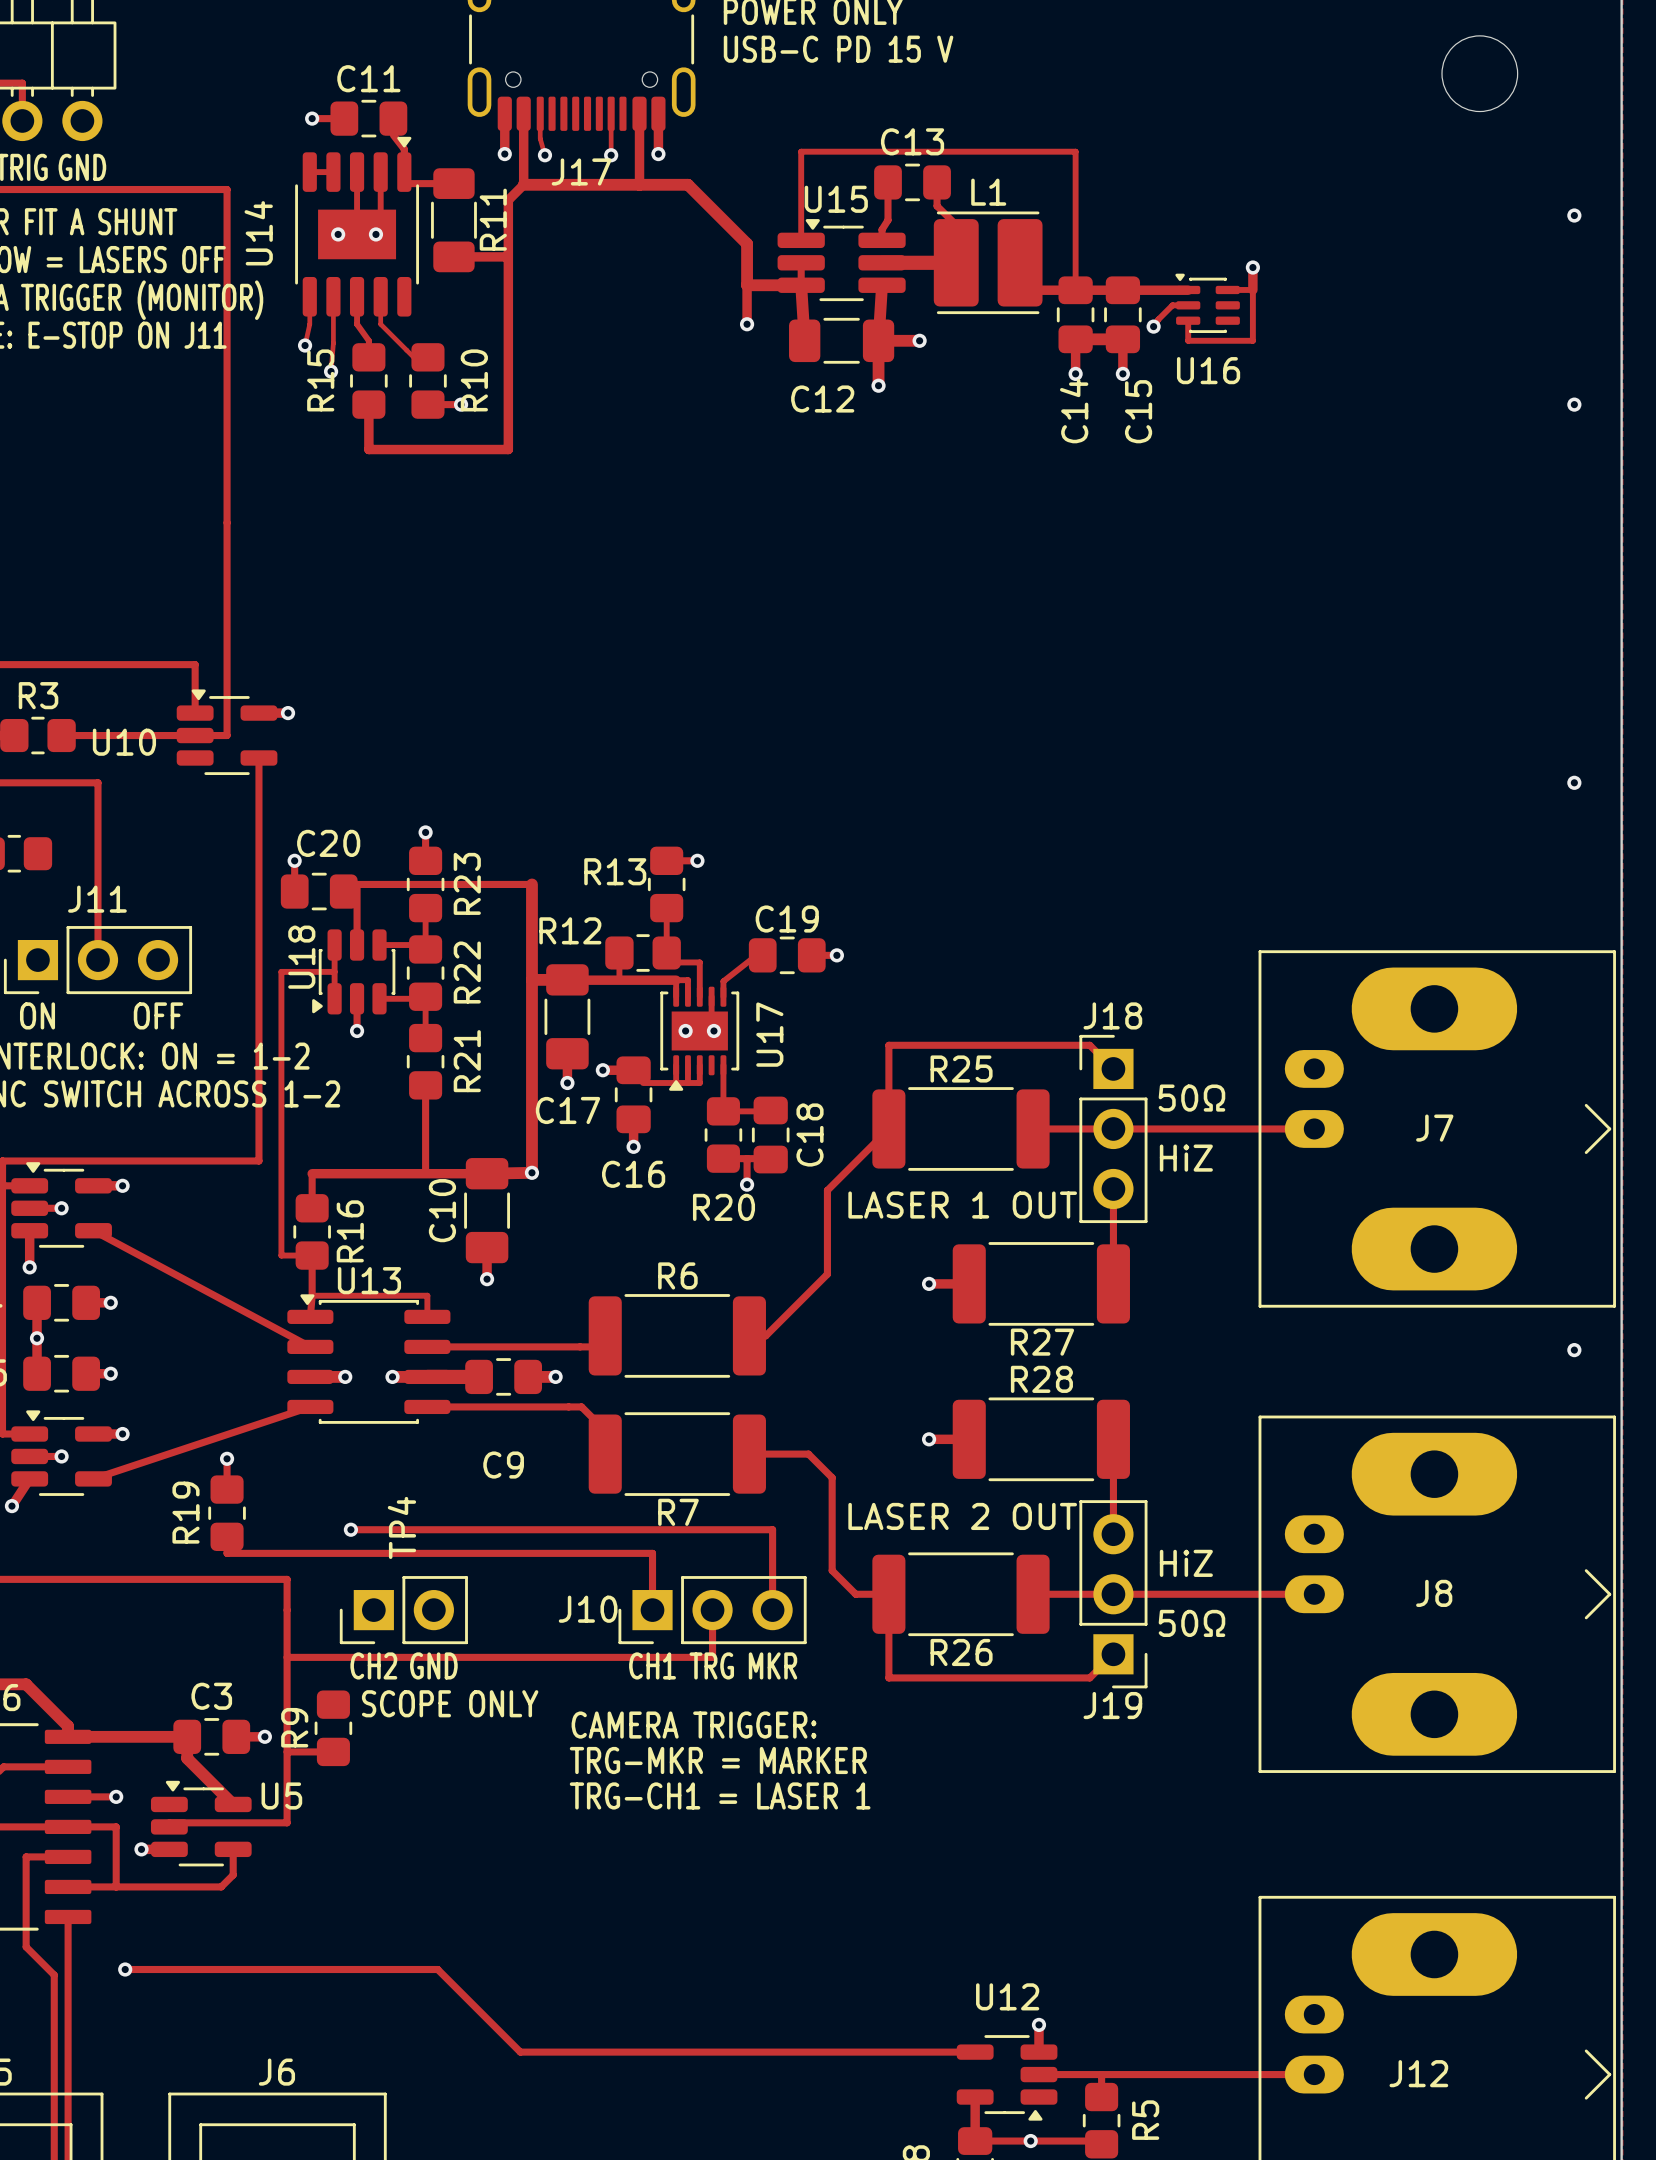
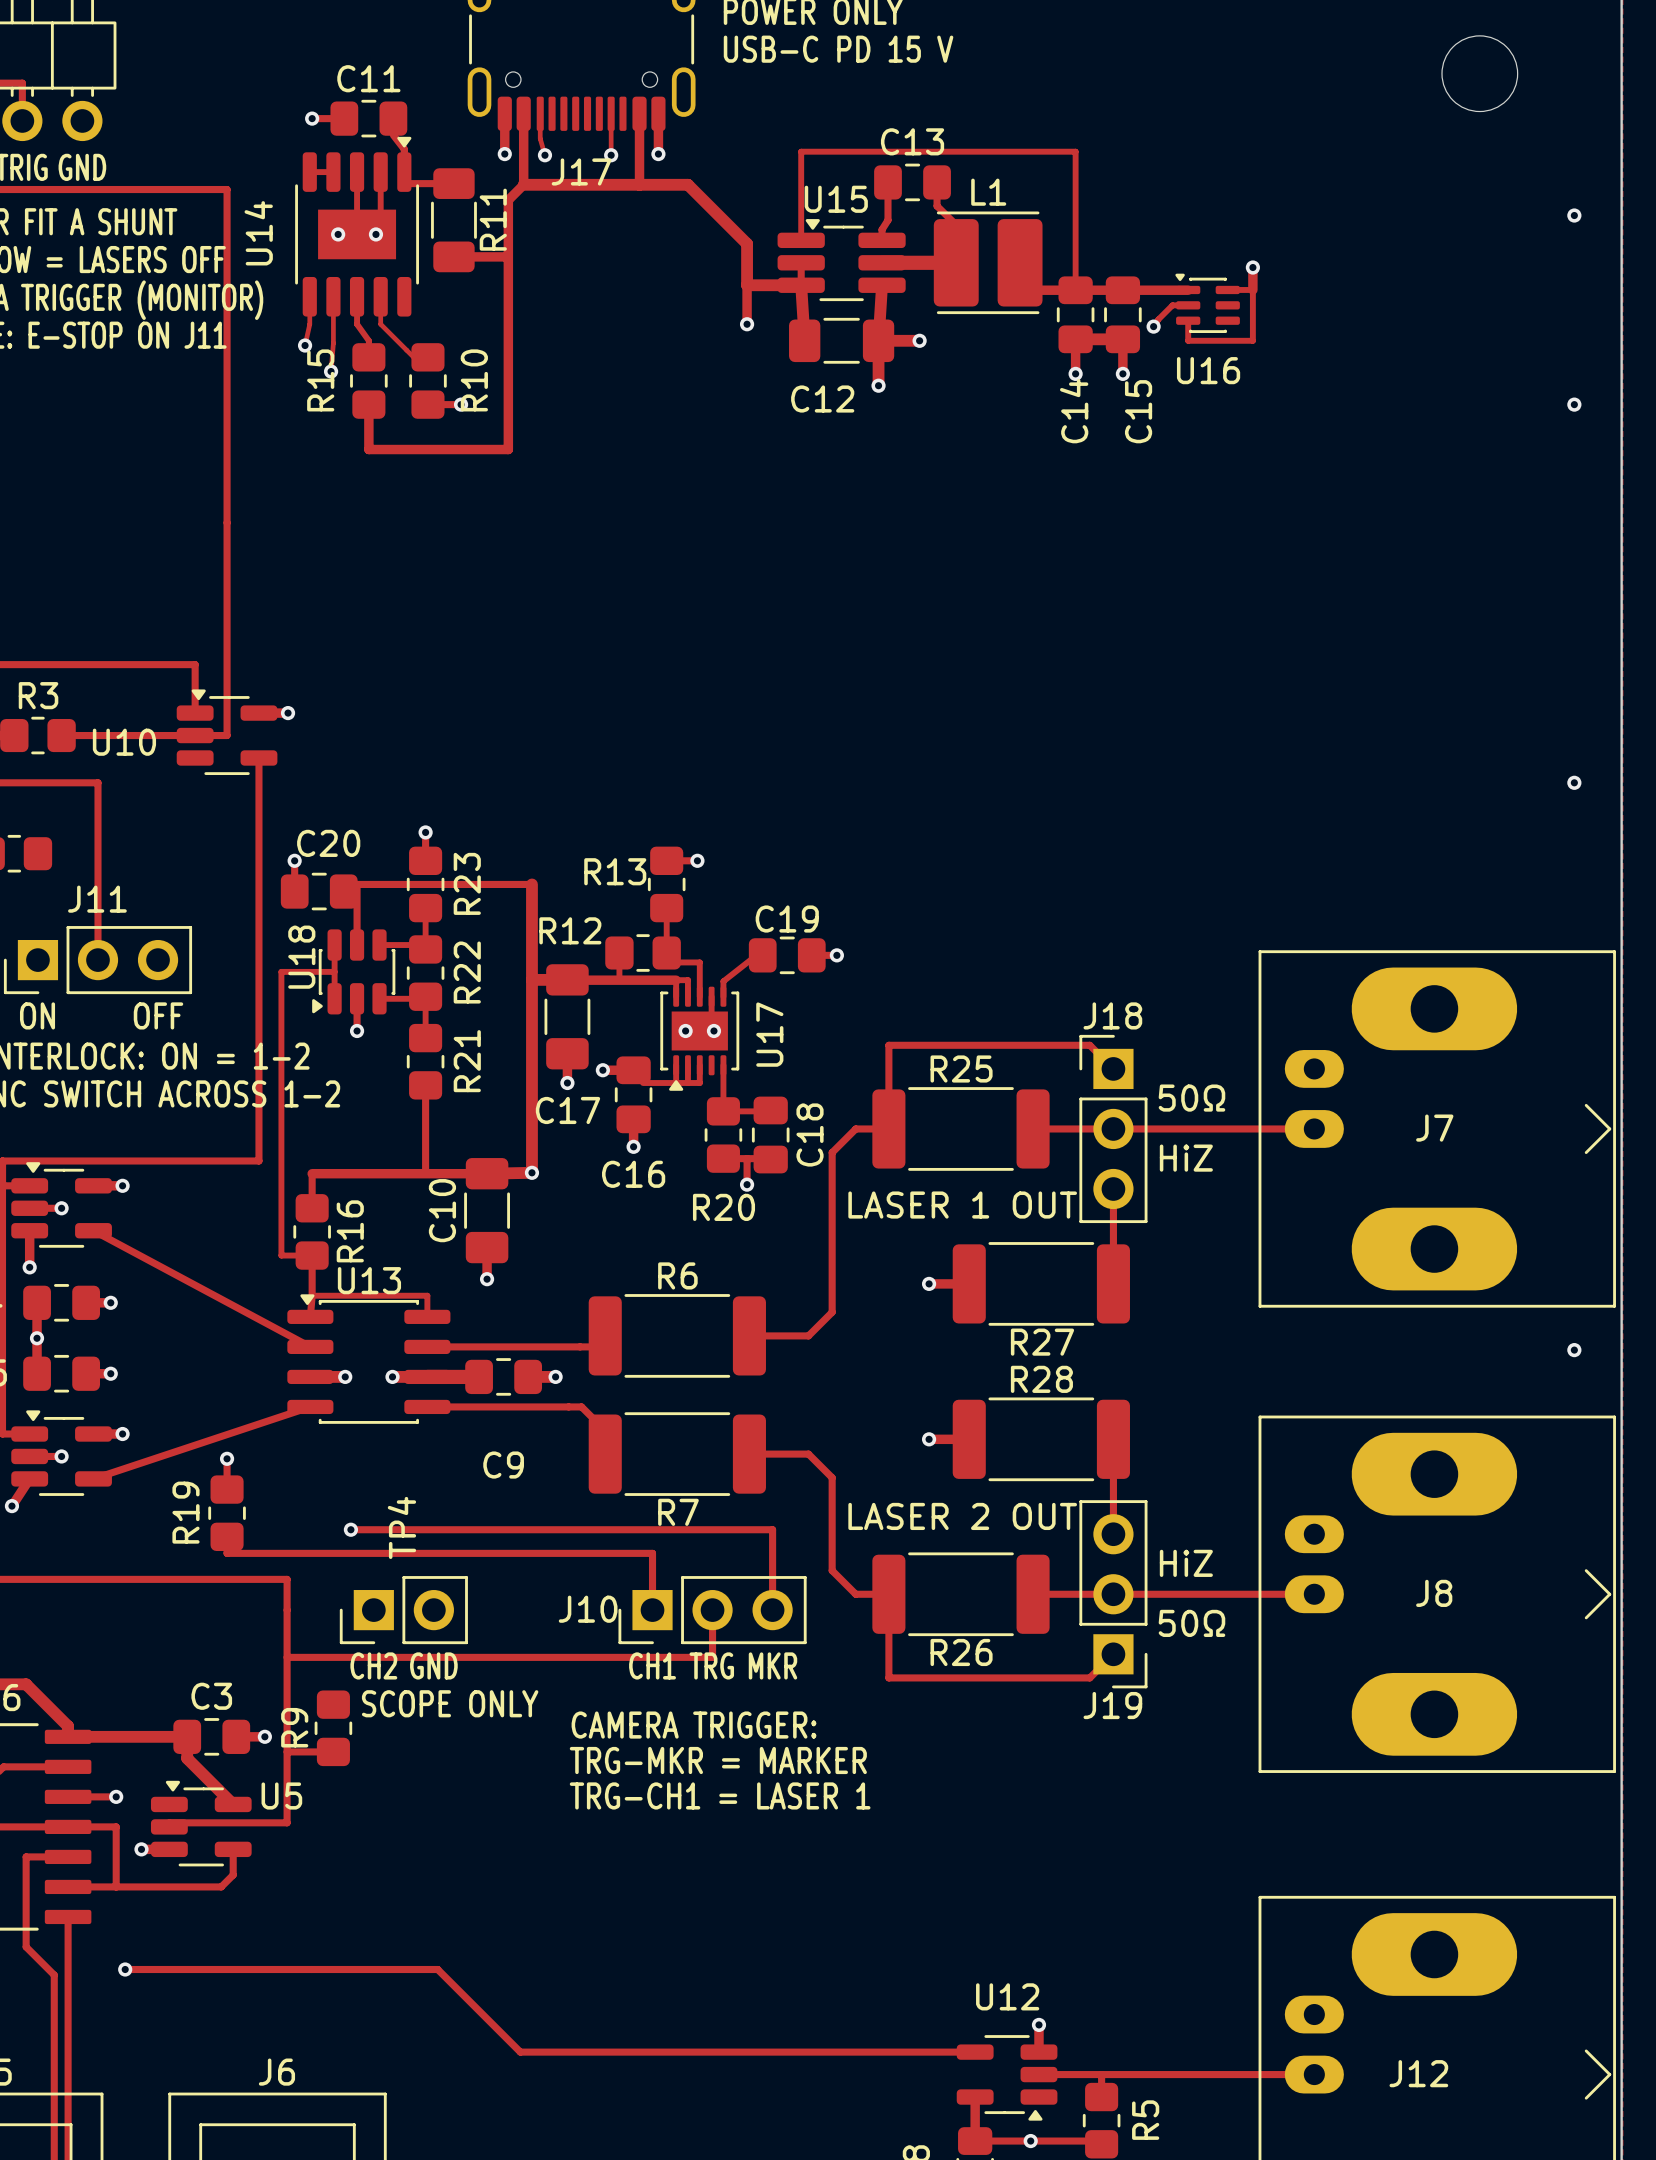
track: (888, 1128) (827, 1190) (827, 1274) (765, 1335) -> (888, 1128) (855, 1128) (832, 1152) (832, 1312) (808, 1335) (765, 1335)

